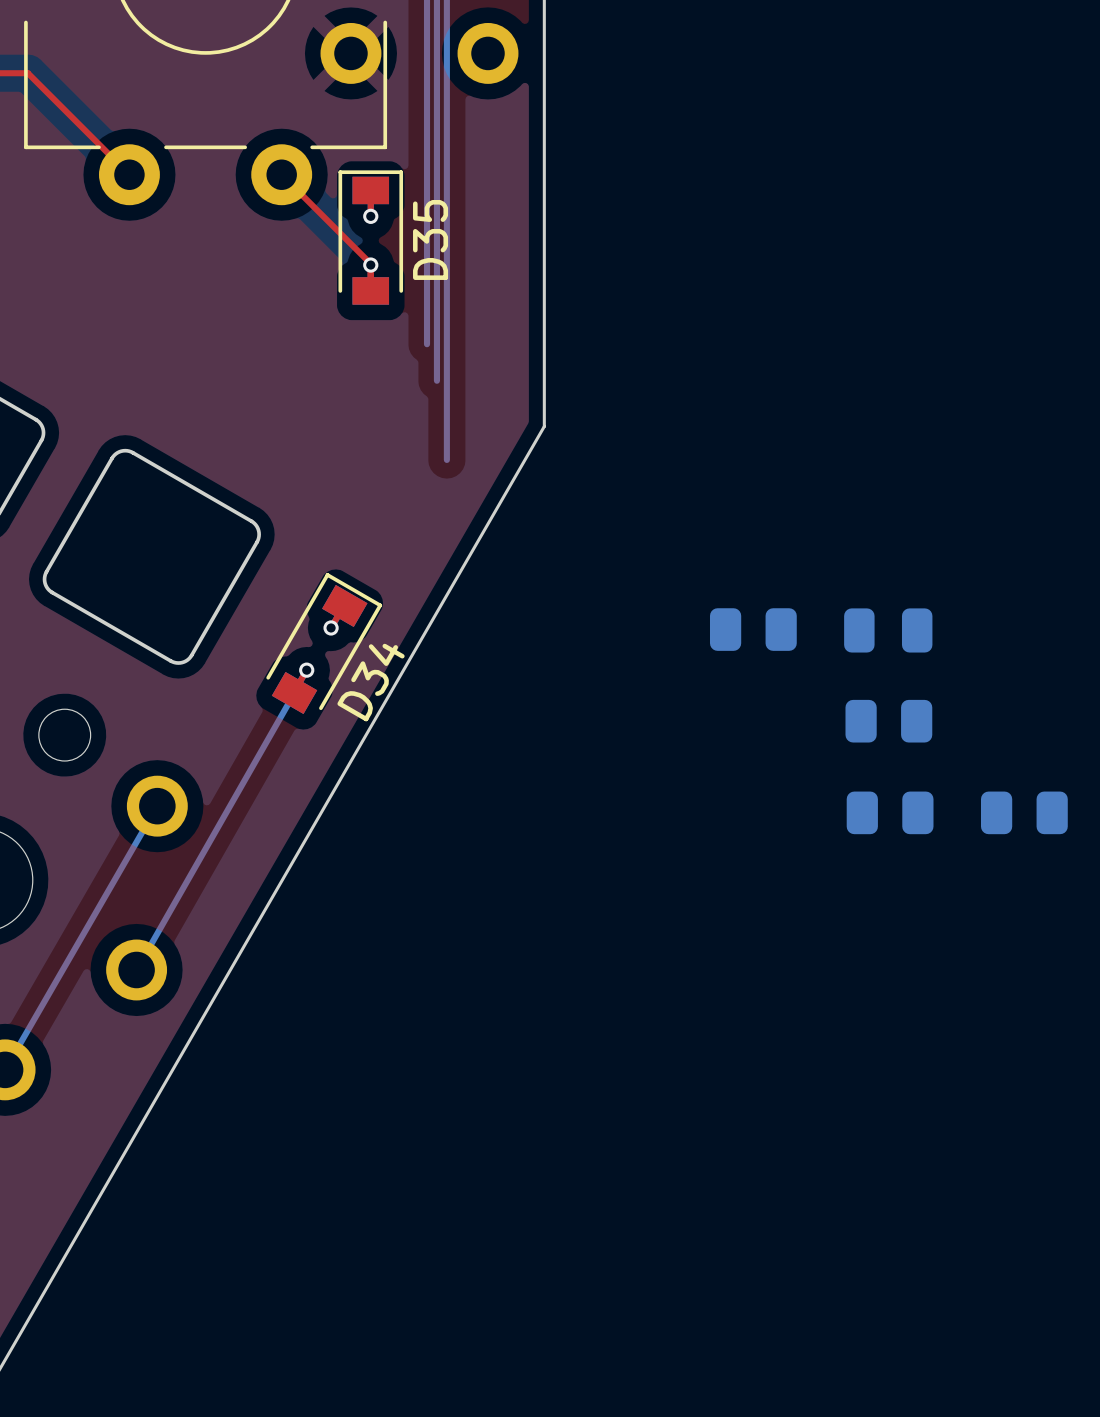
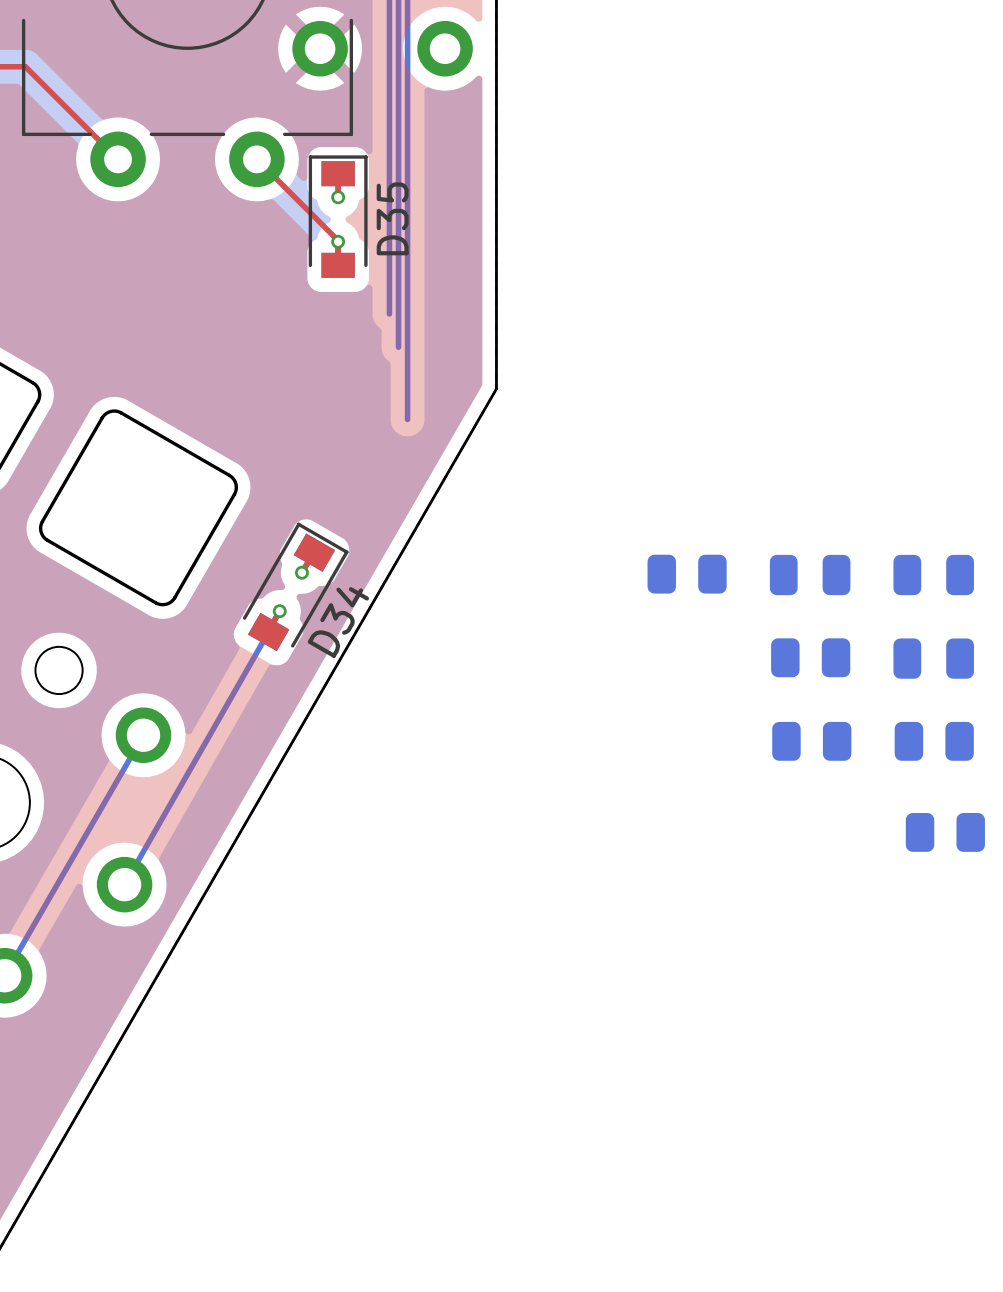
part: none -> (933, 575)
part: none -> (933, 658)
part: none -> (945, 832)

